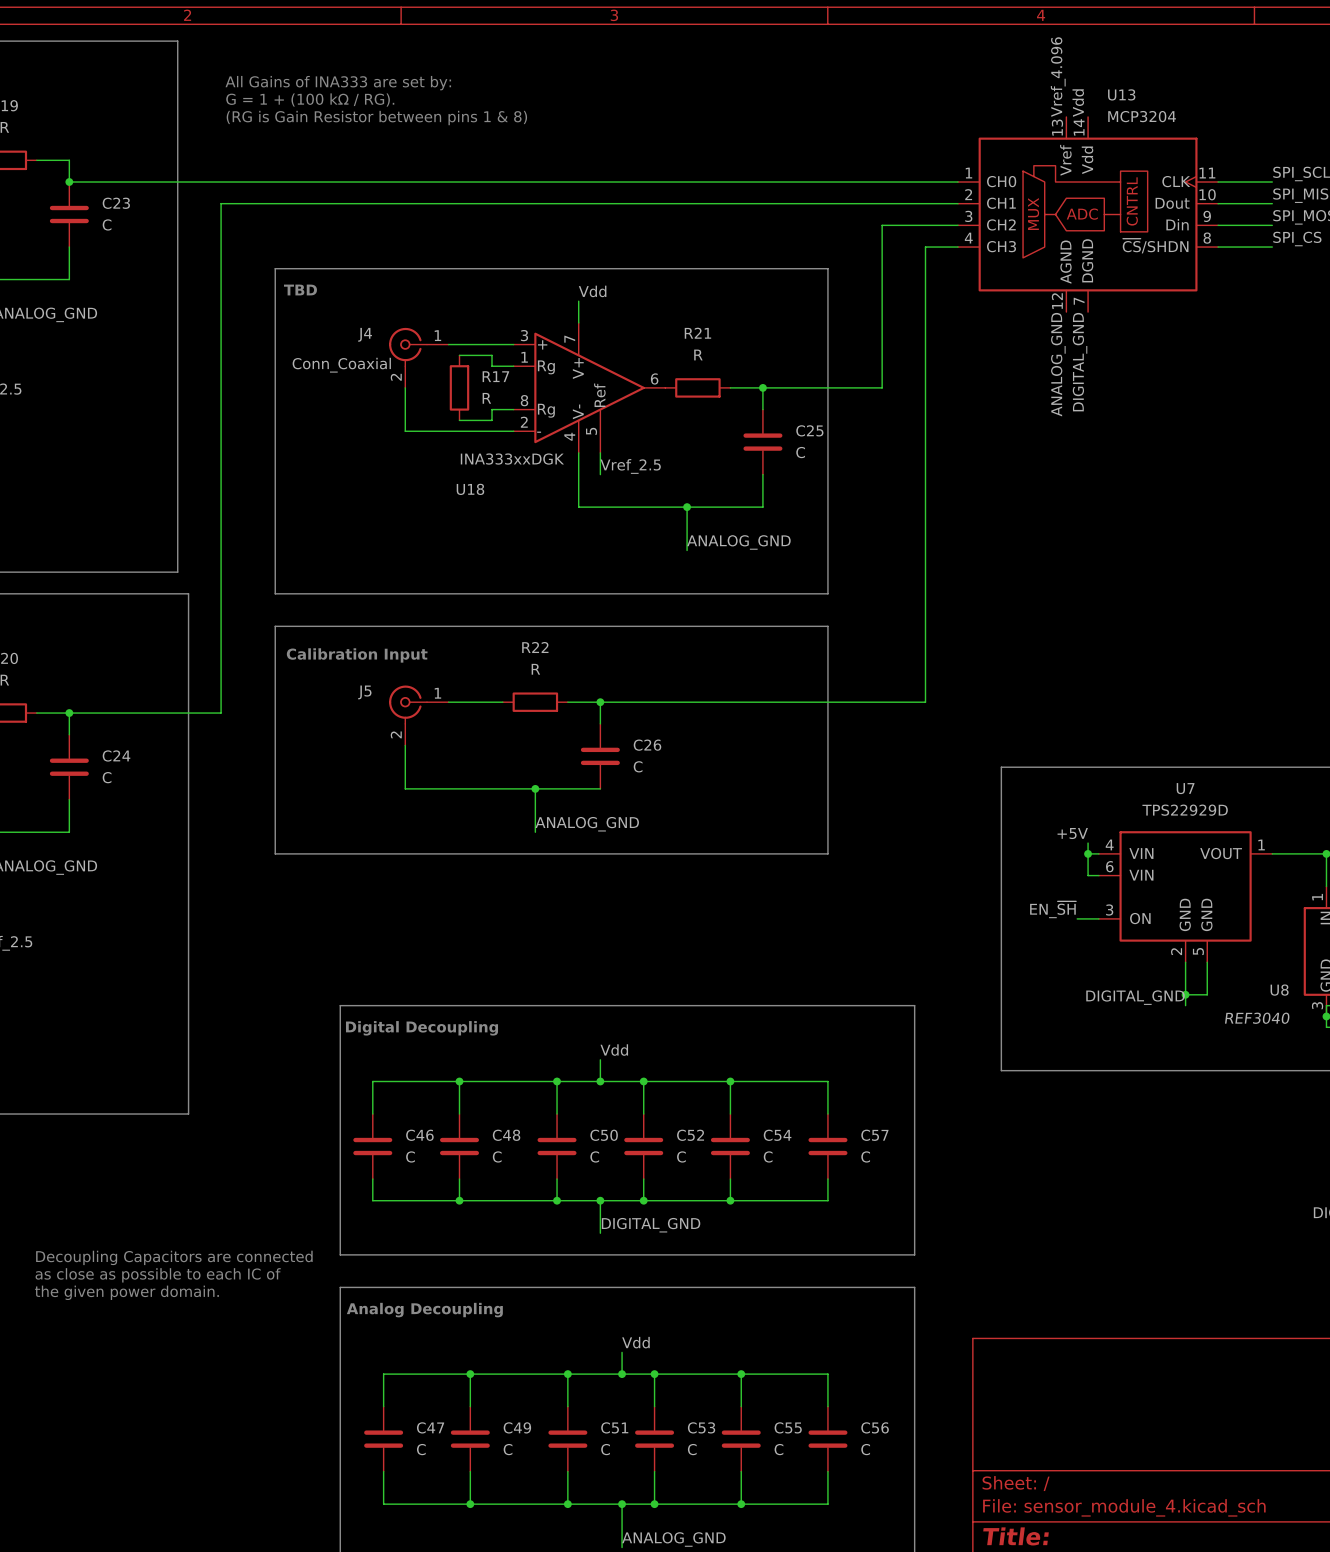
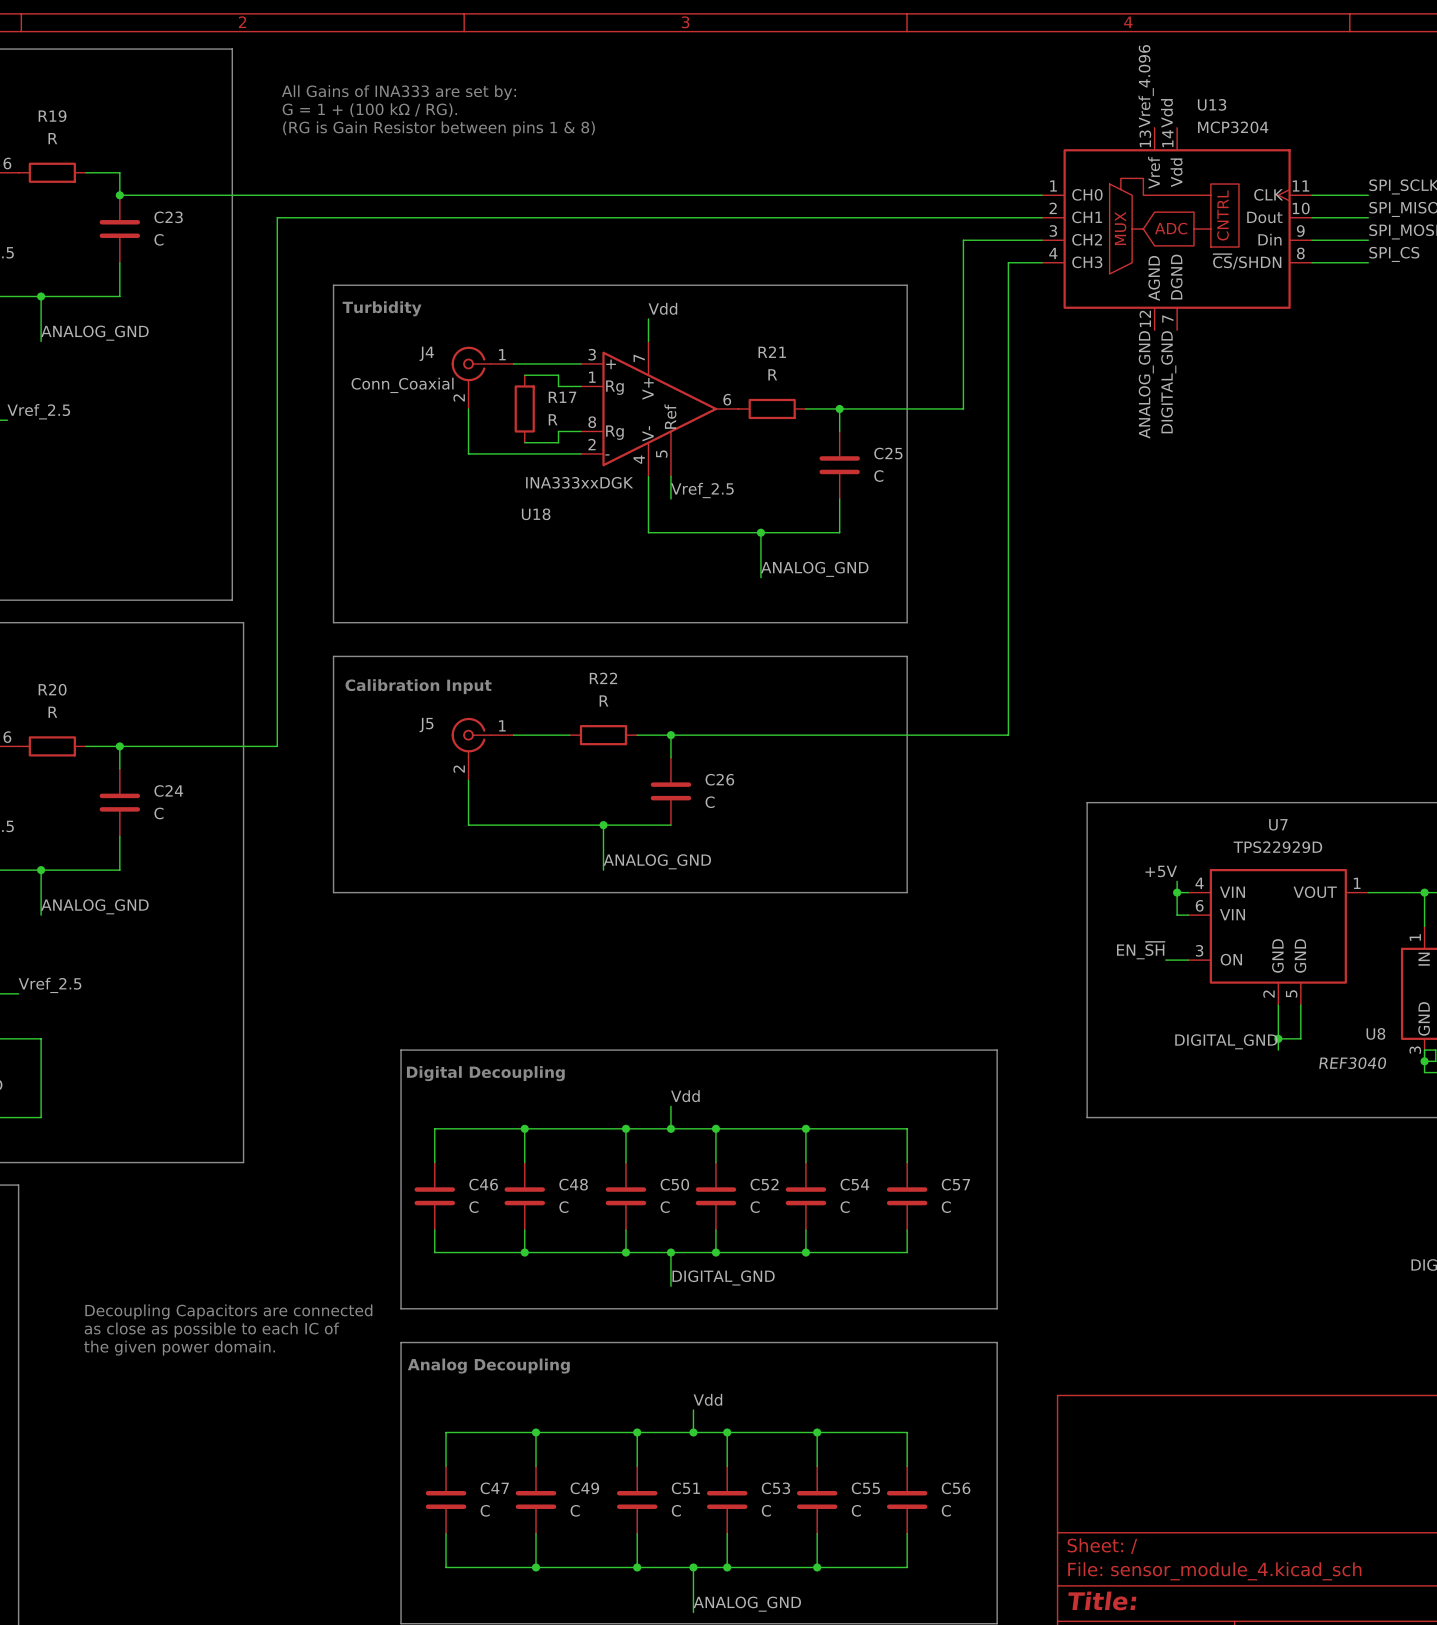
text: TBD (300, 290) -> Turbidity (382, 308)

